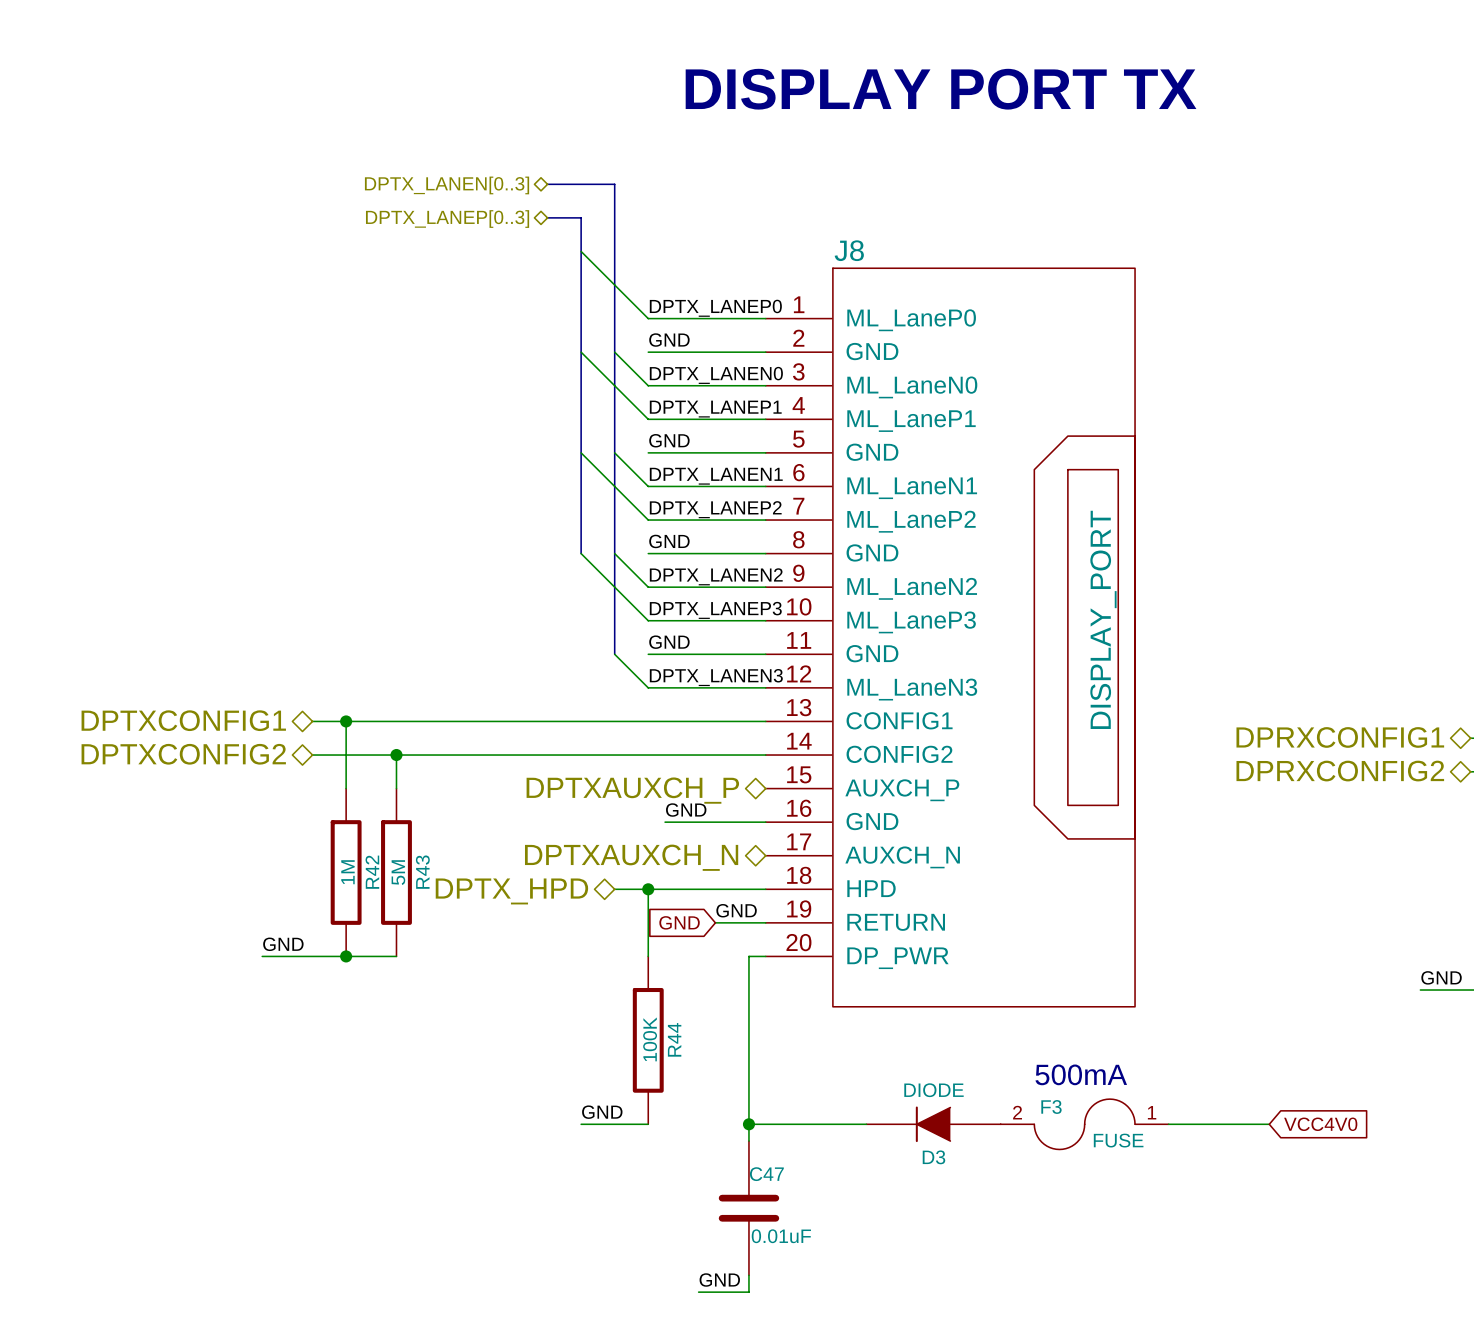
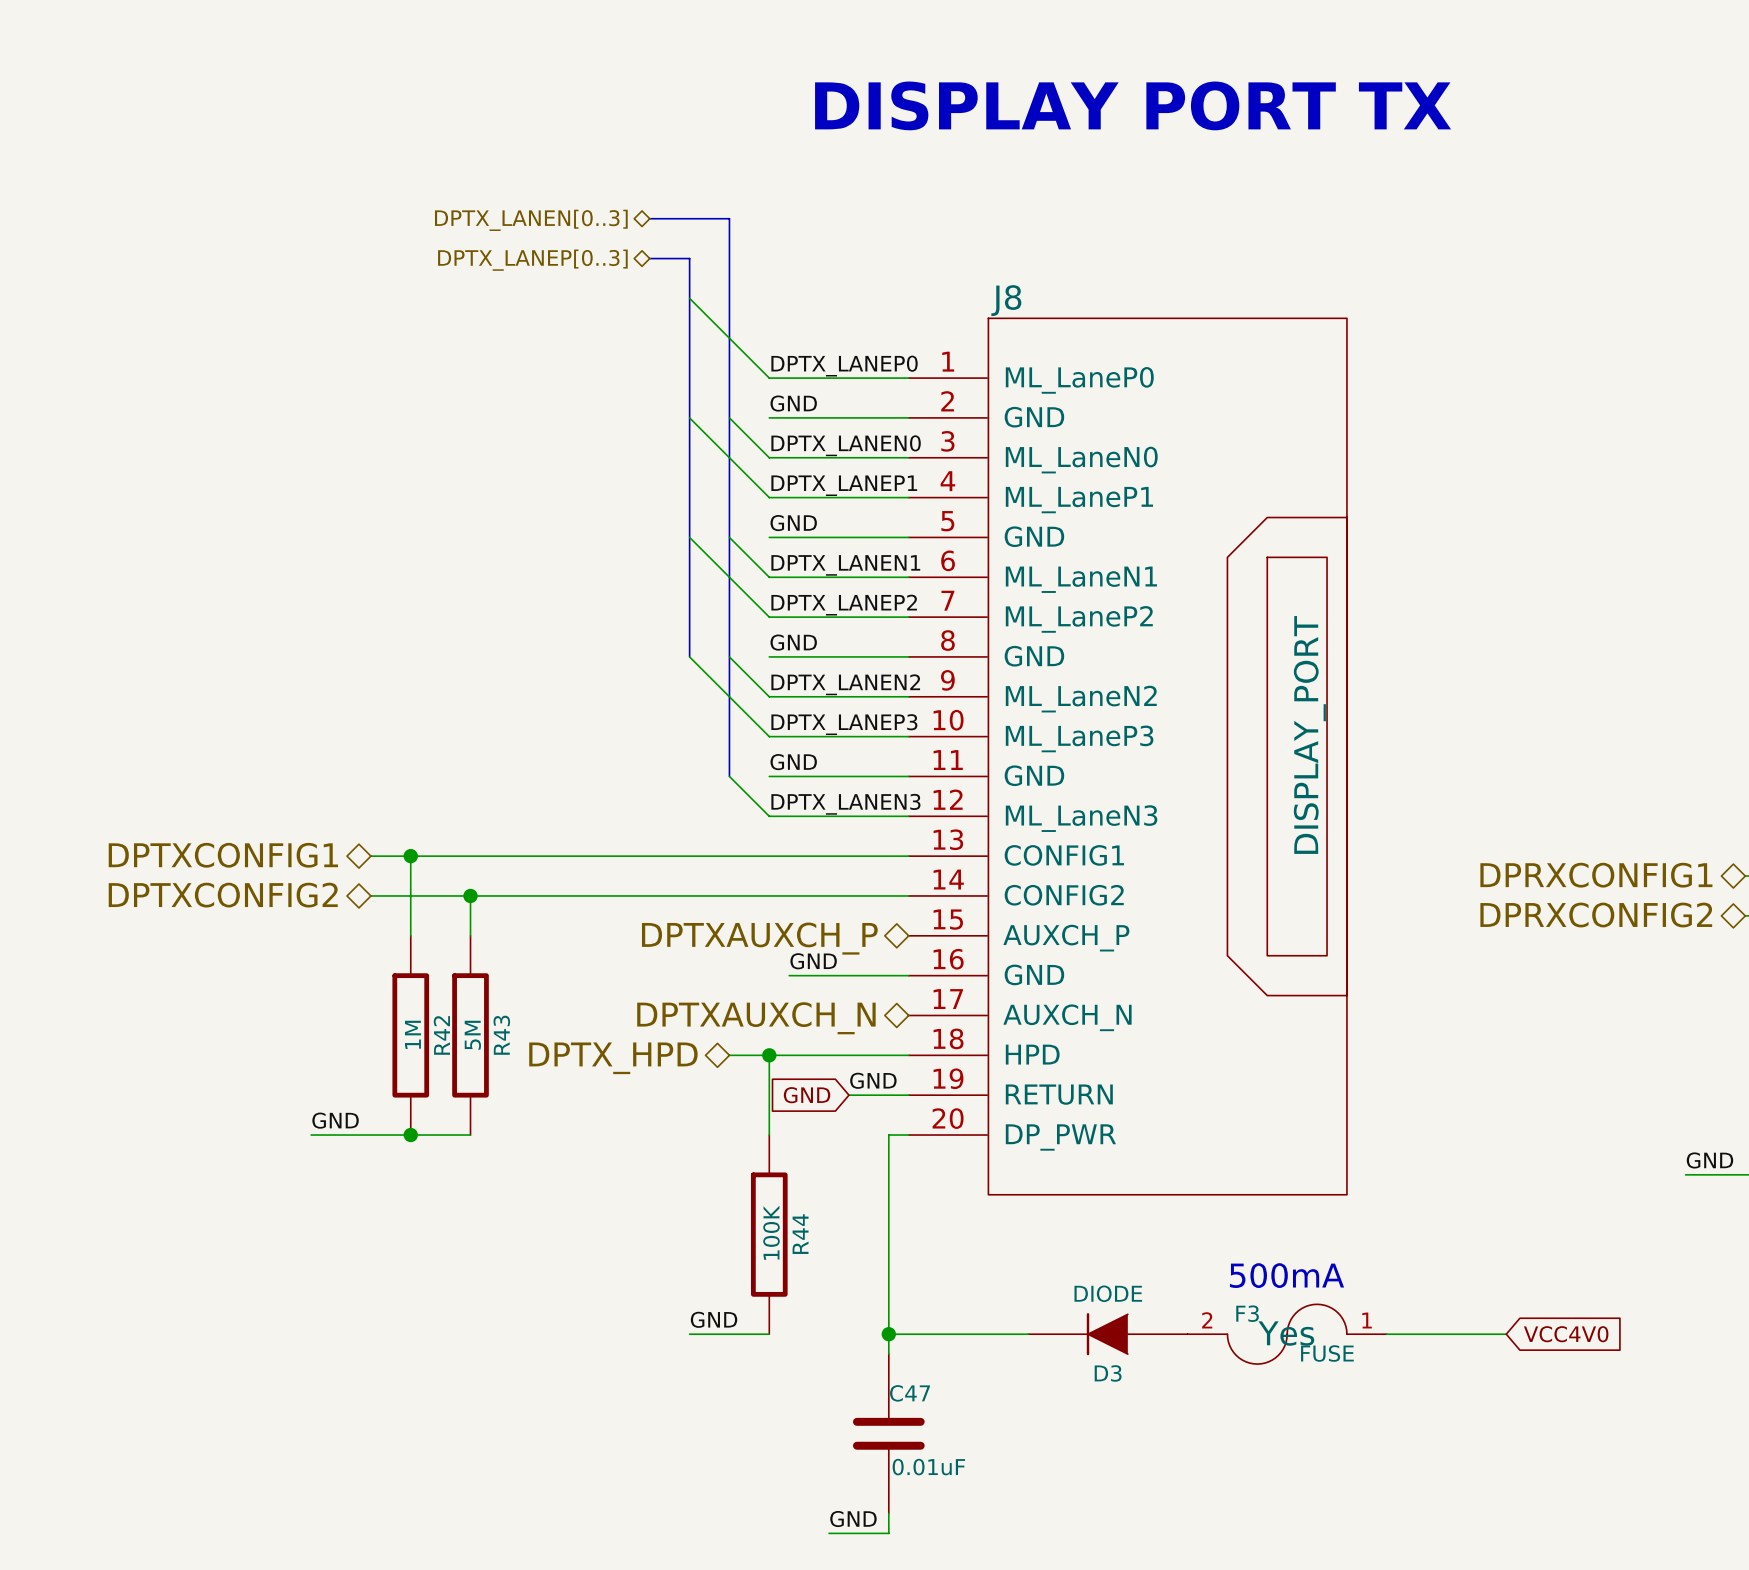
F3 text: none -> Yes (1286, 1333)

